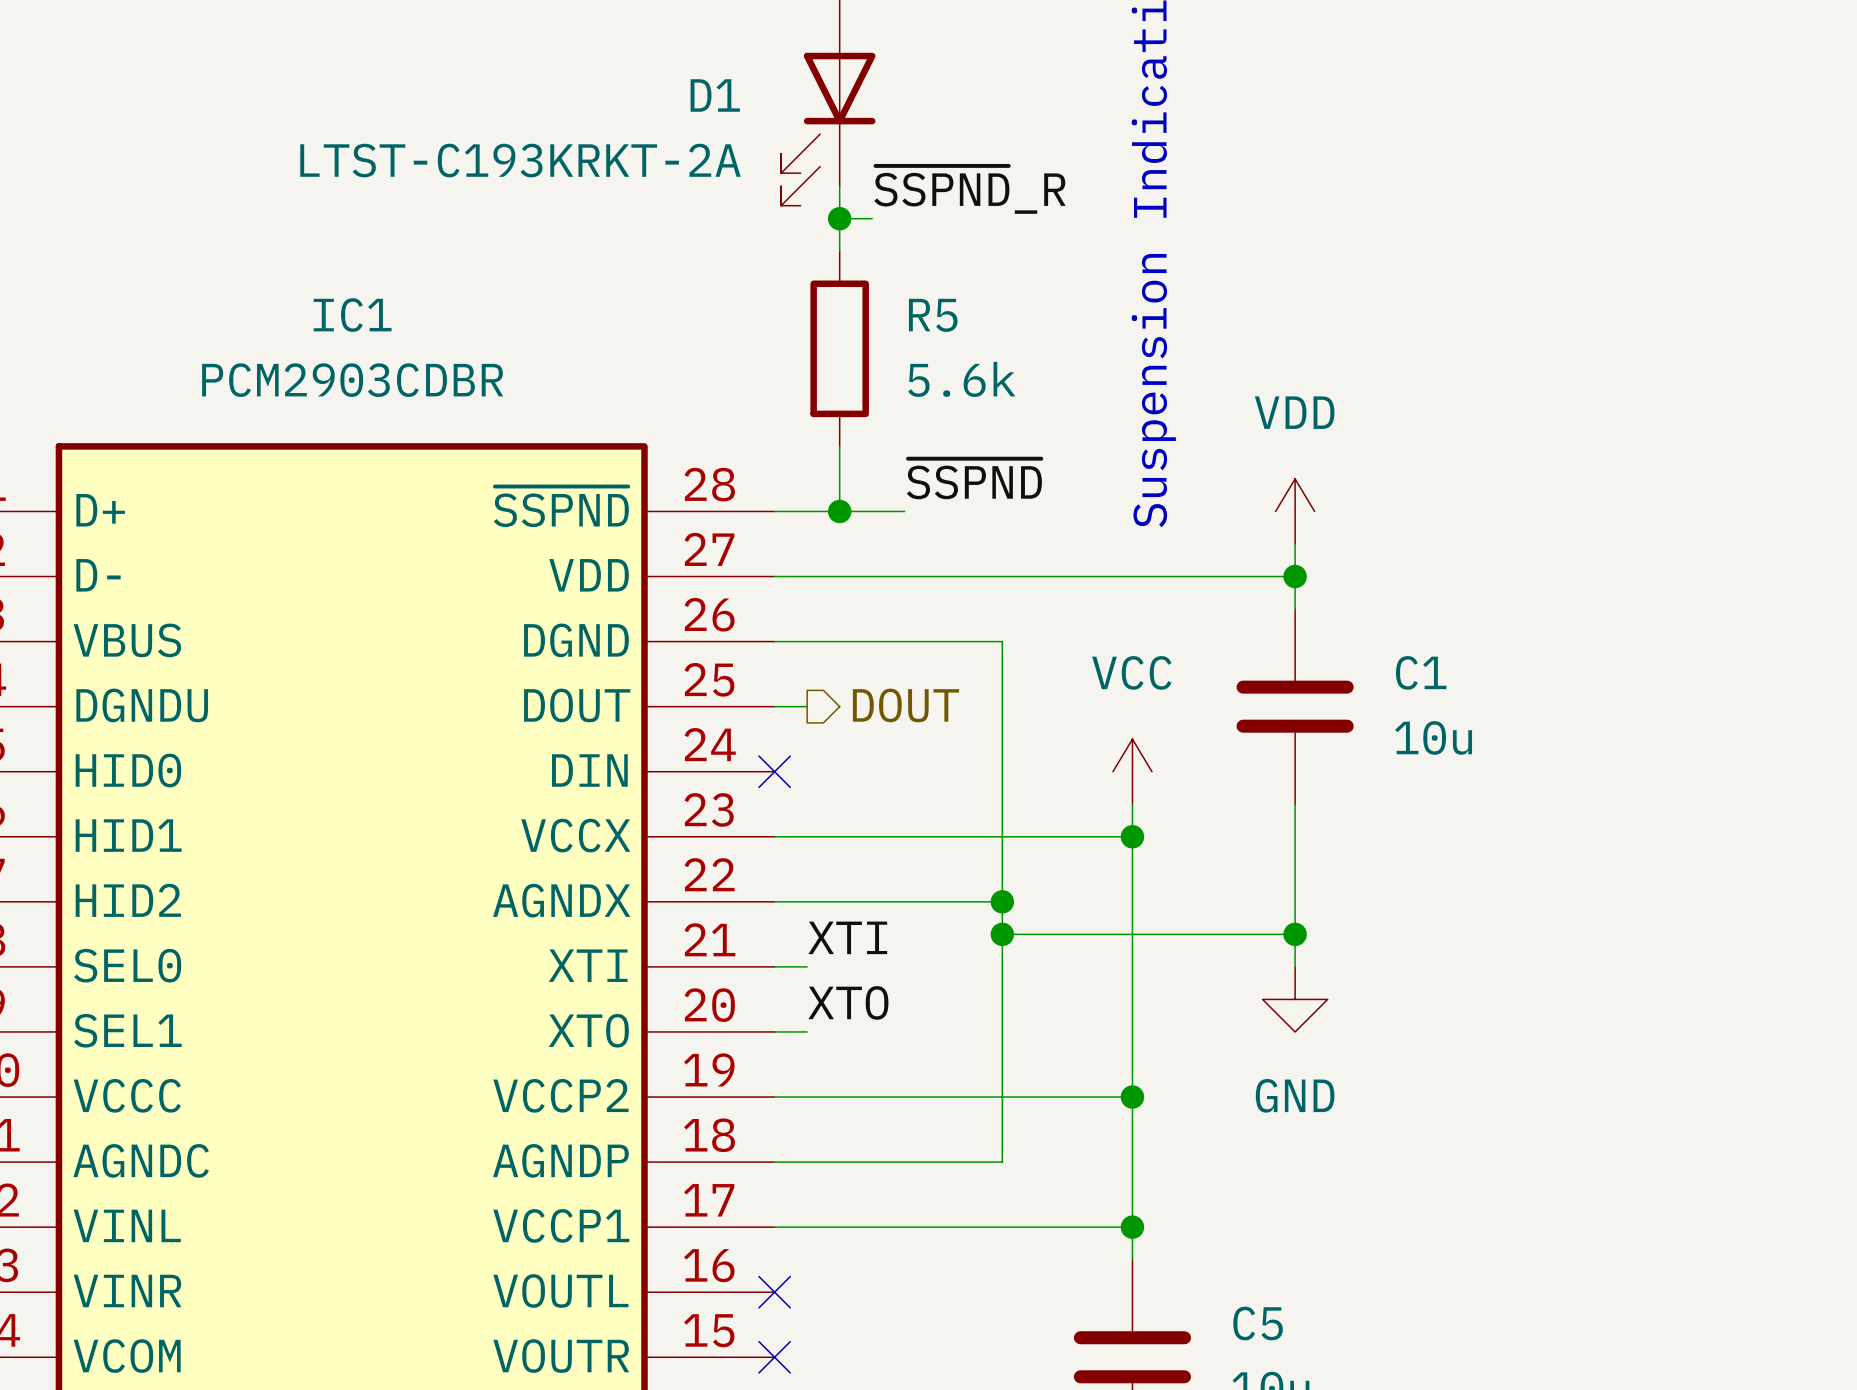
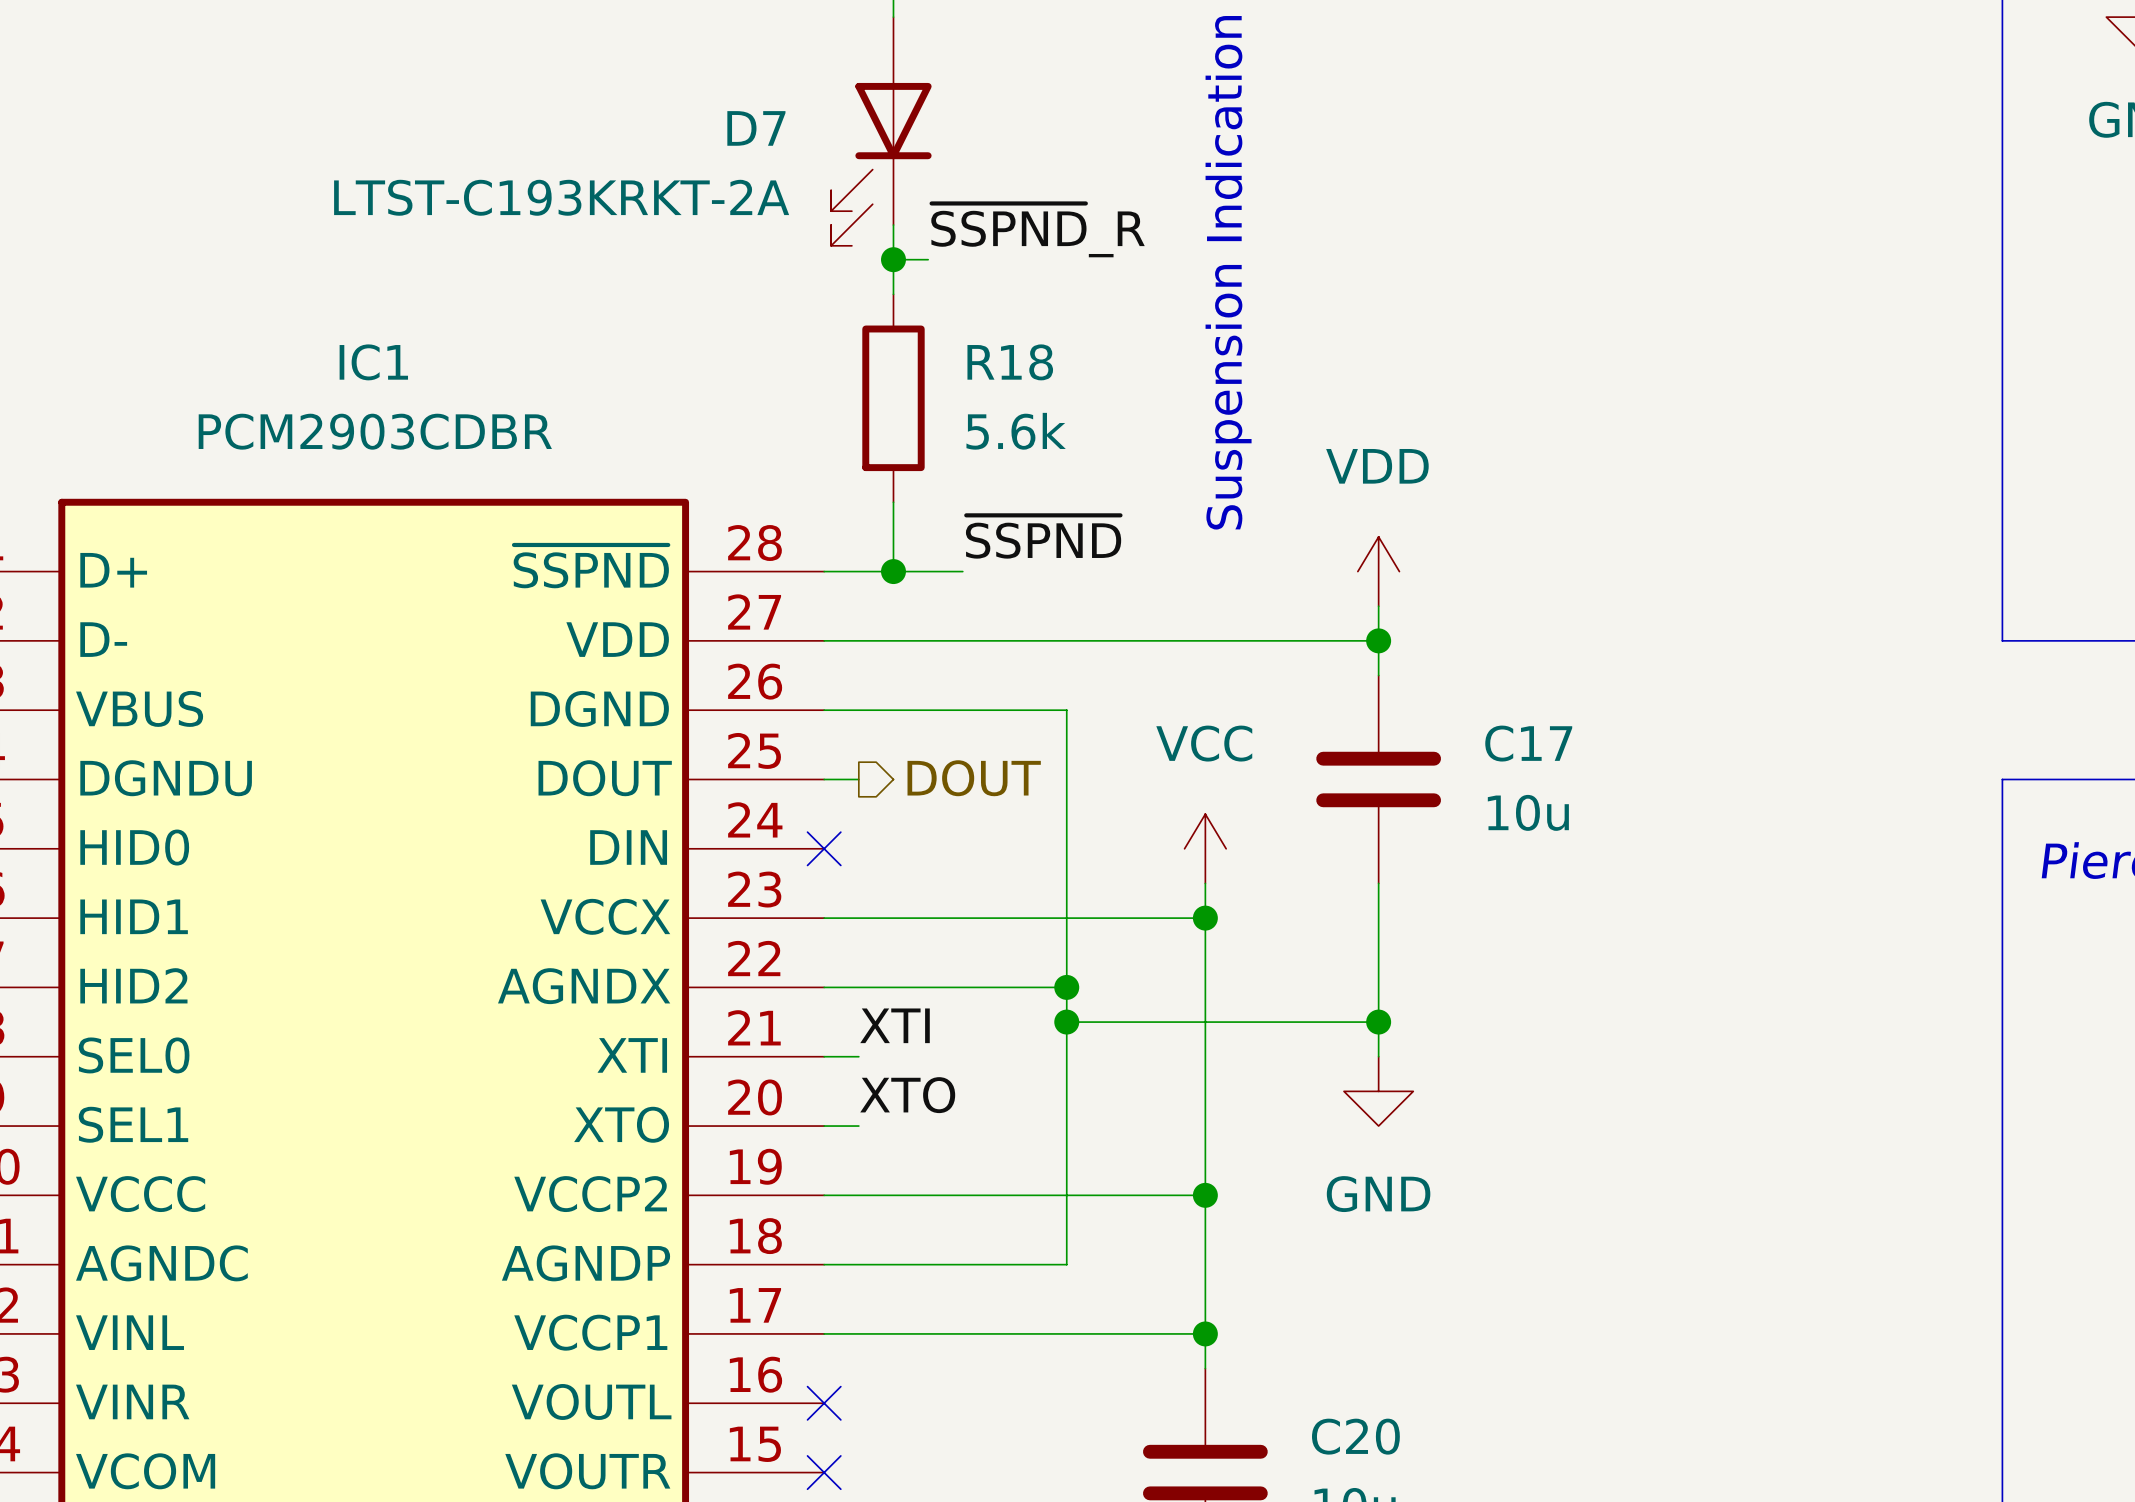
D1 name: D1 (715, 95) -> D7 (756, 128)
R5 name: R5 (933, 315) -> R18 (1010, 362)
C1 name: C1 (1421, 672) -> C17 (1528, 743)
C5 name: C5 (1258, 1323) -> C20 (1355, 1436)

